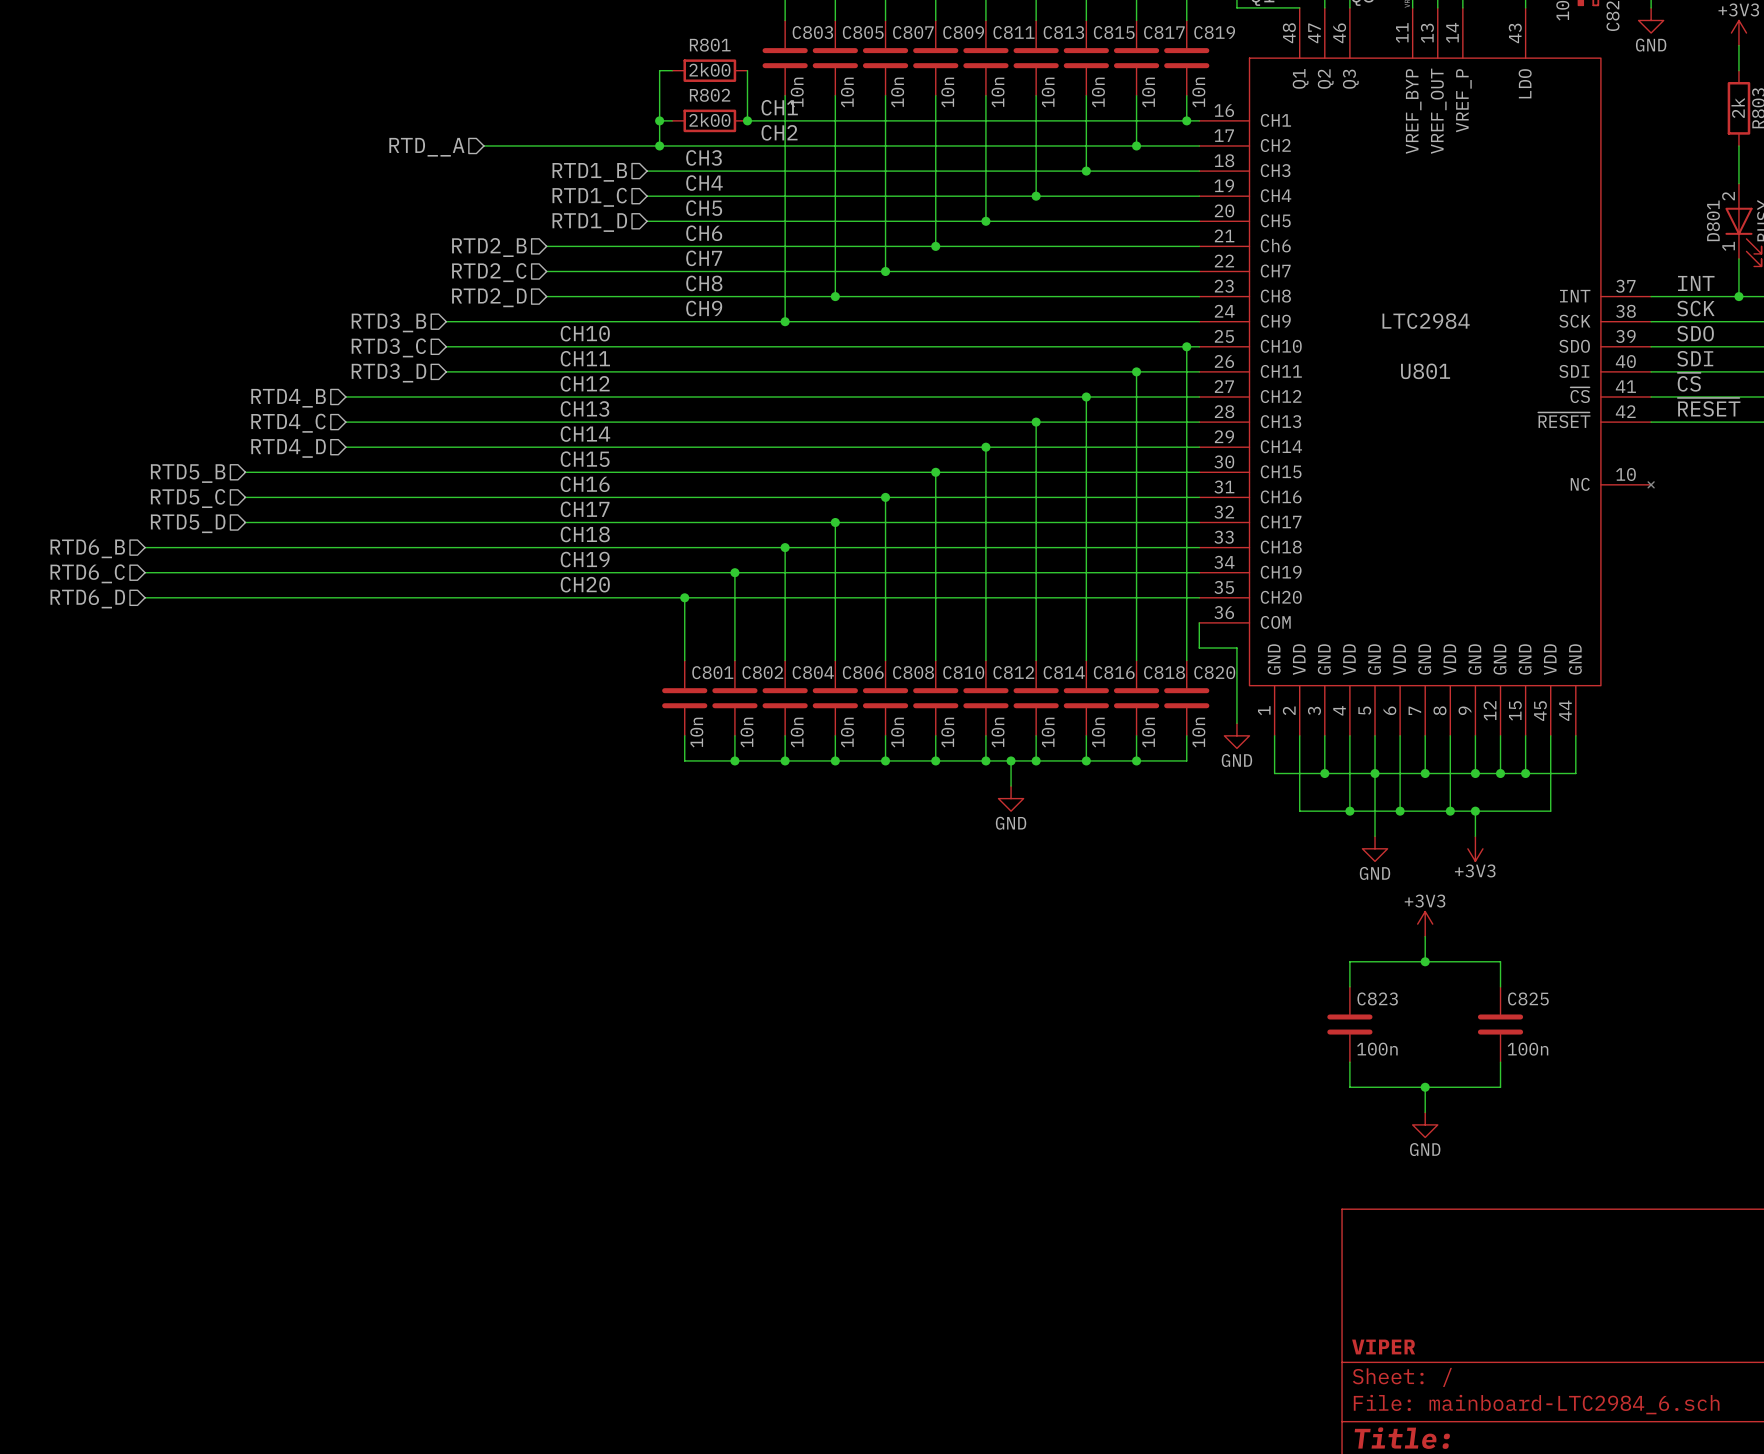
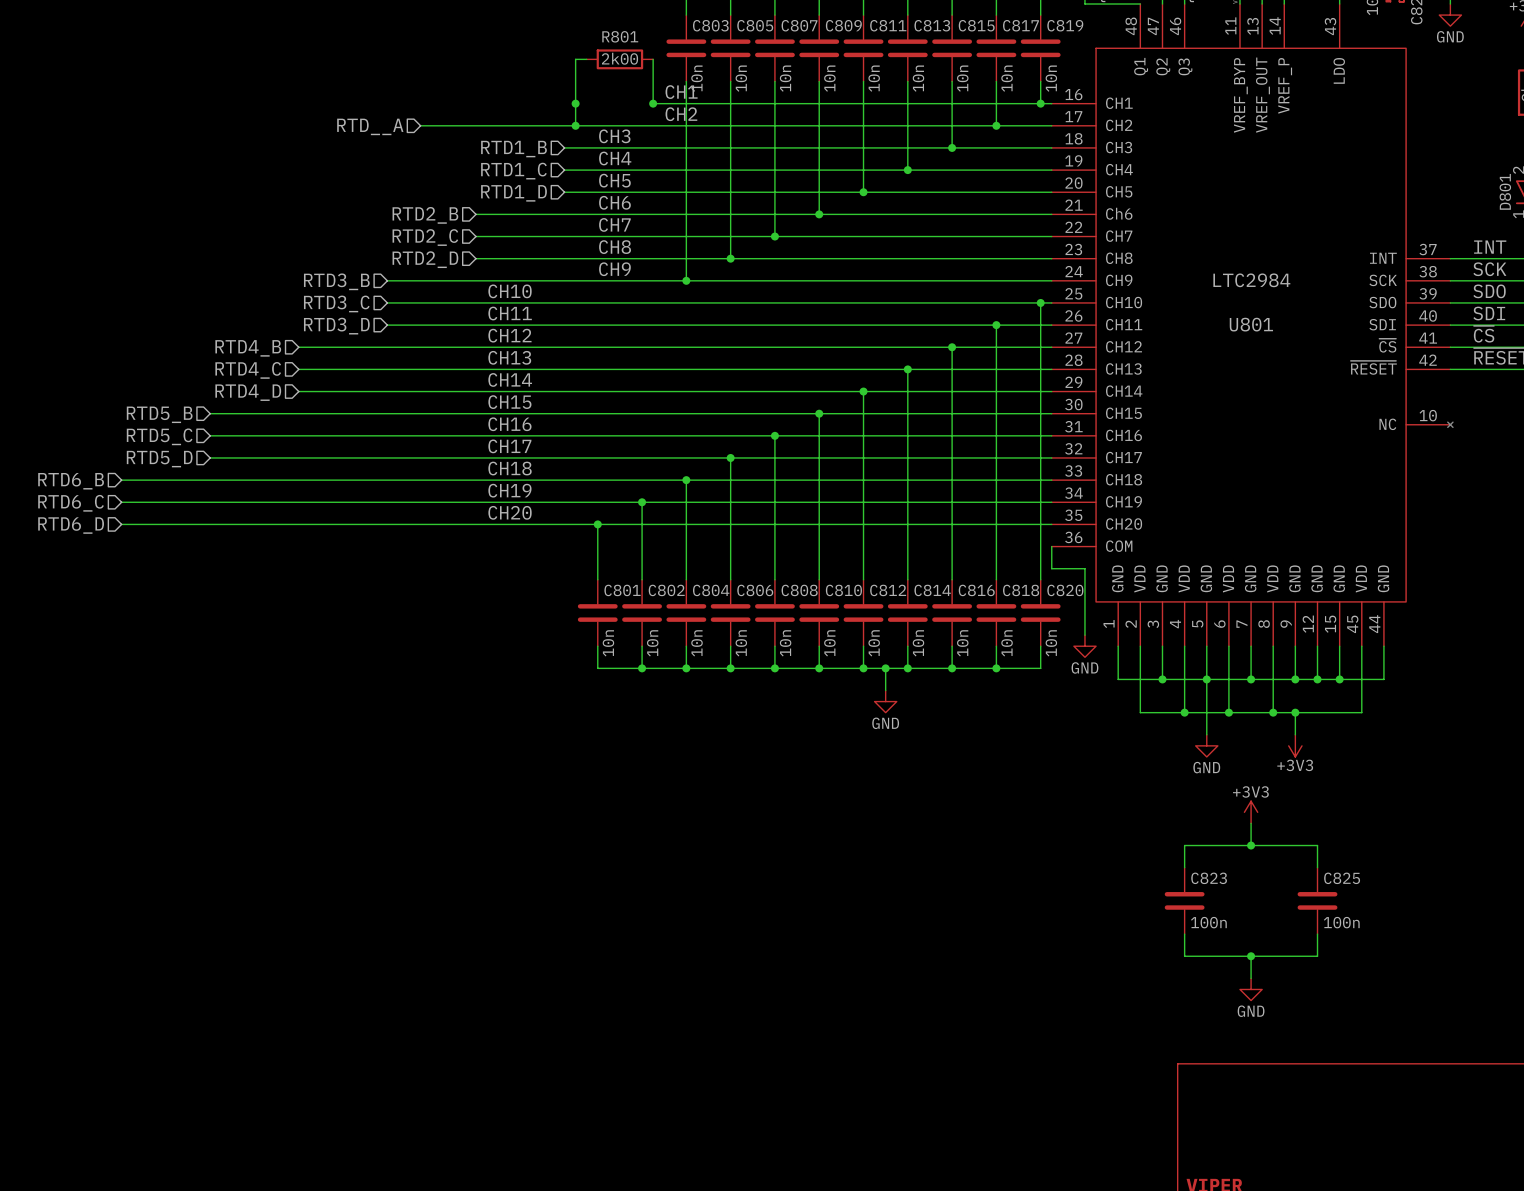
wire: (659, 120) (672, 120) -> none
R802: 2k00 (709, 120) -> none

